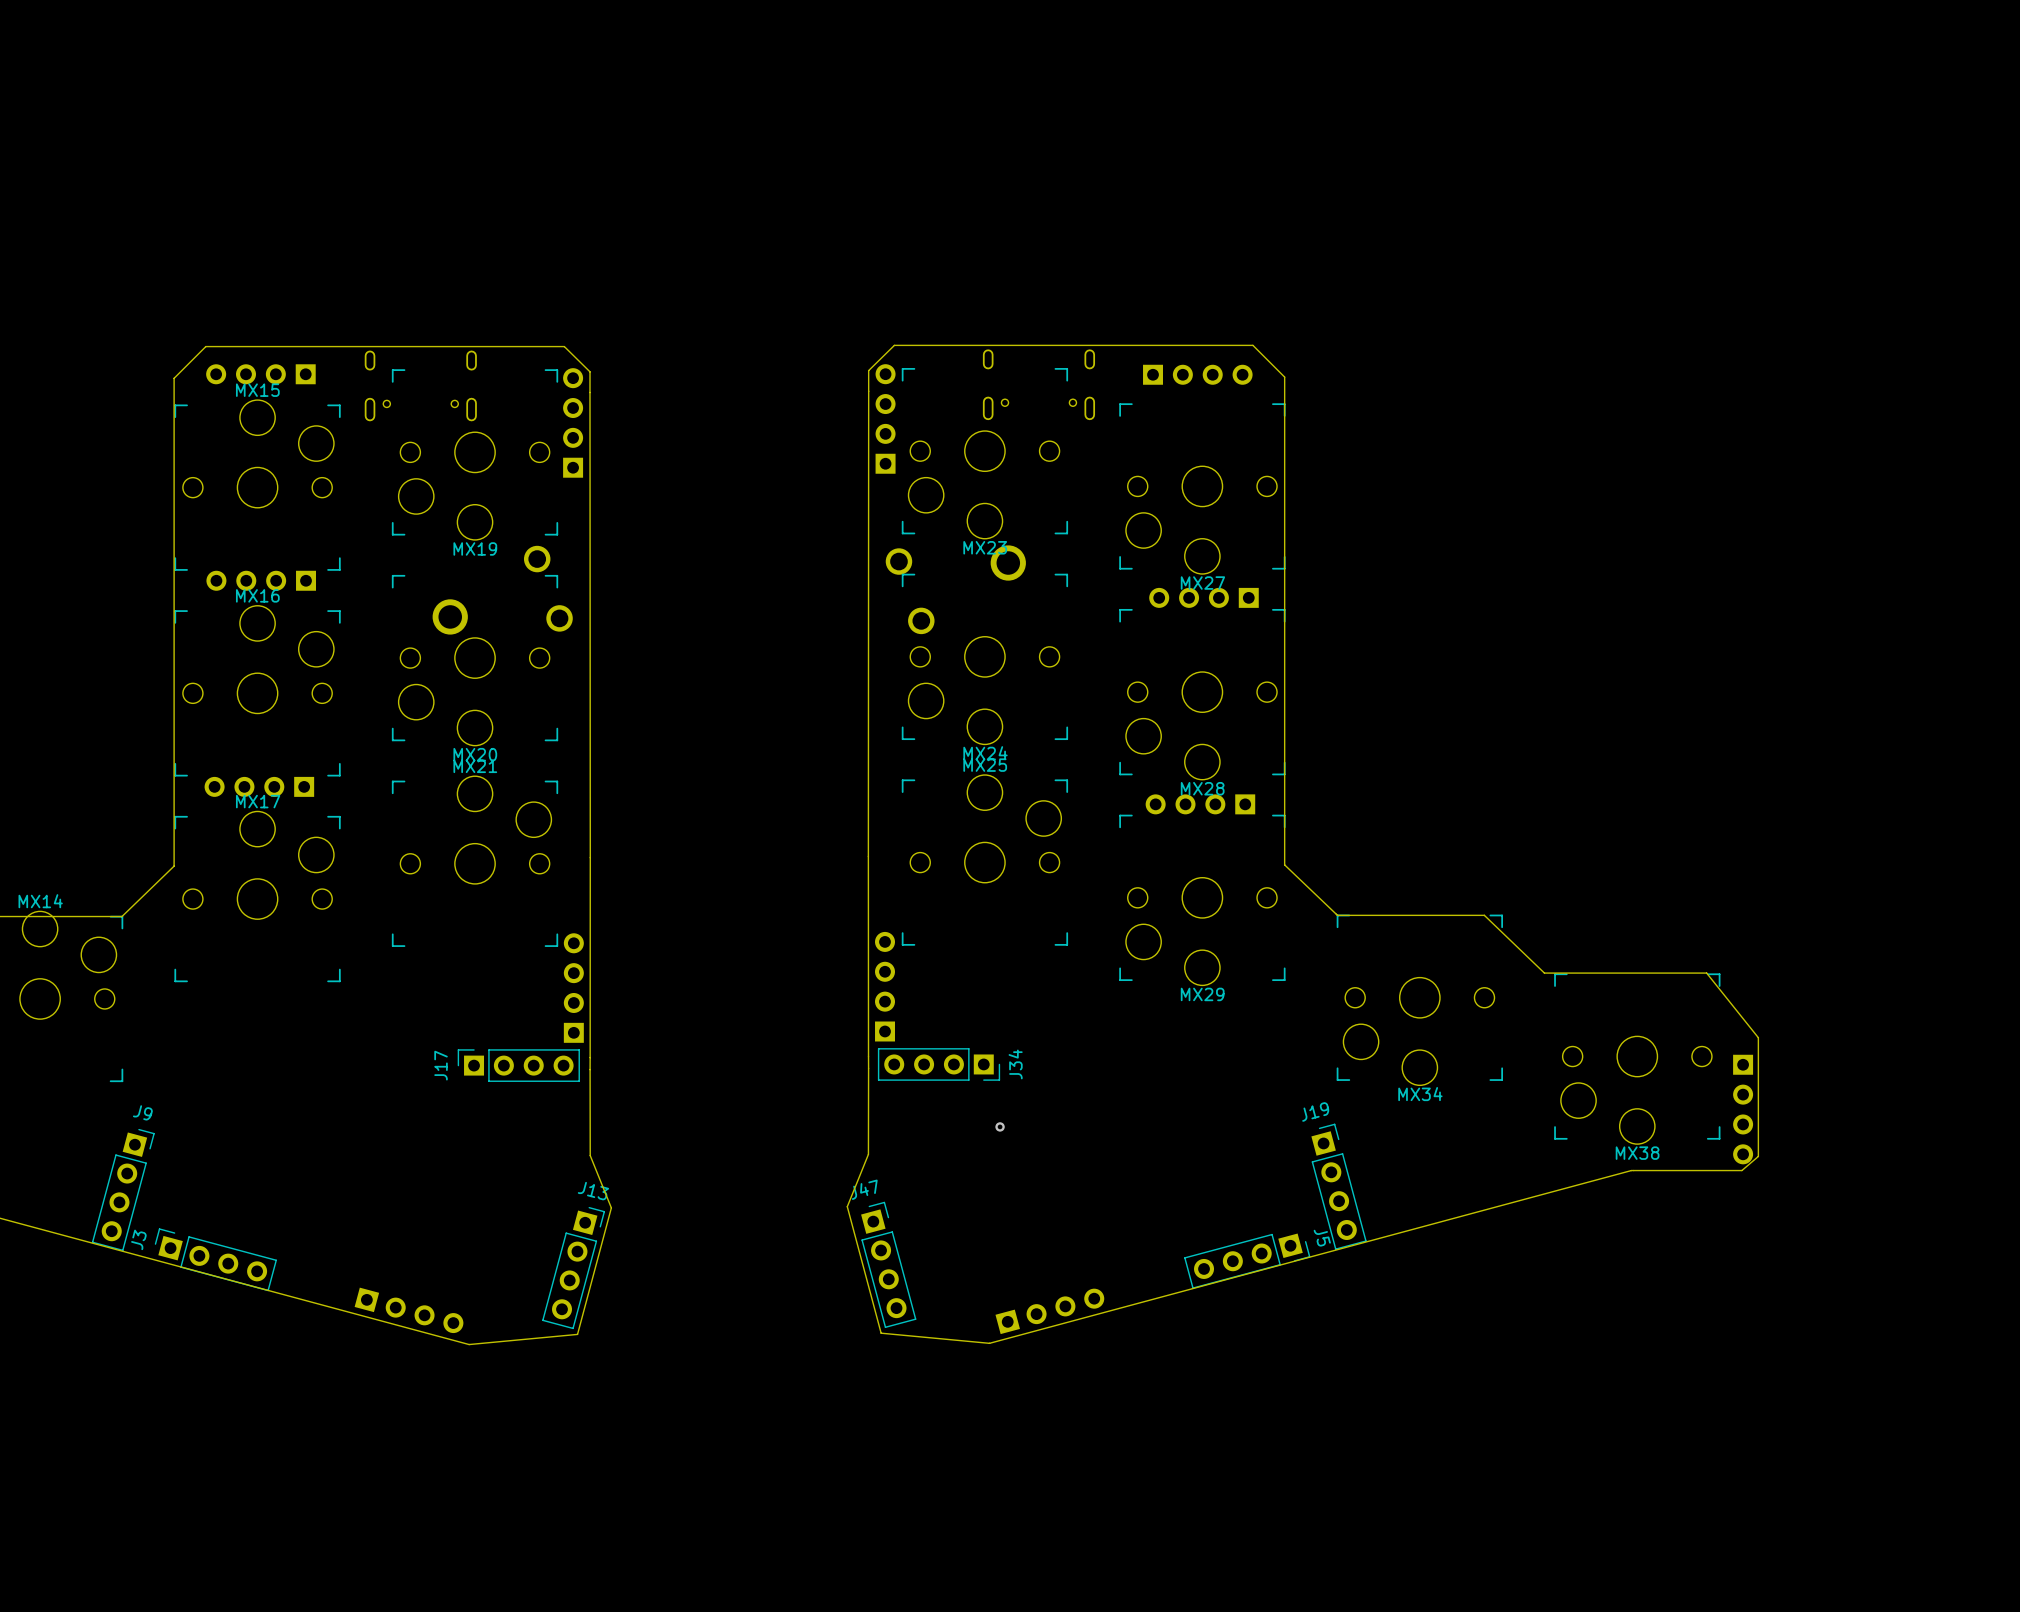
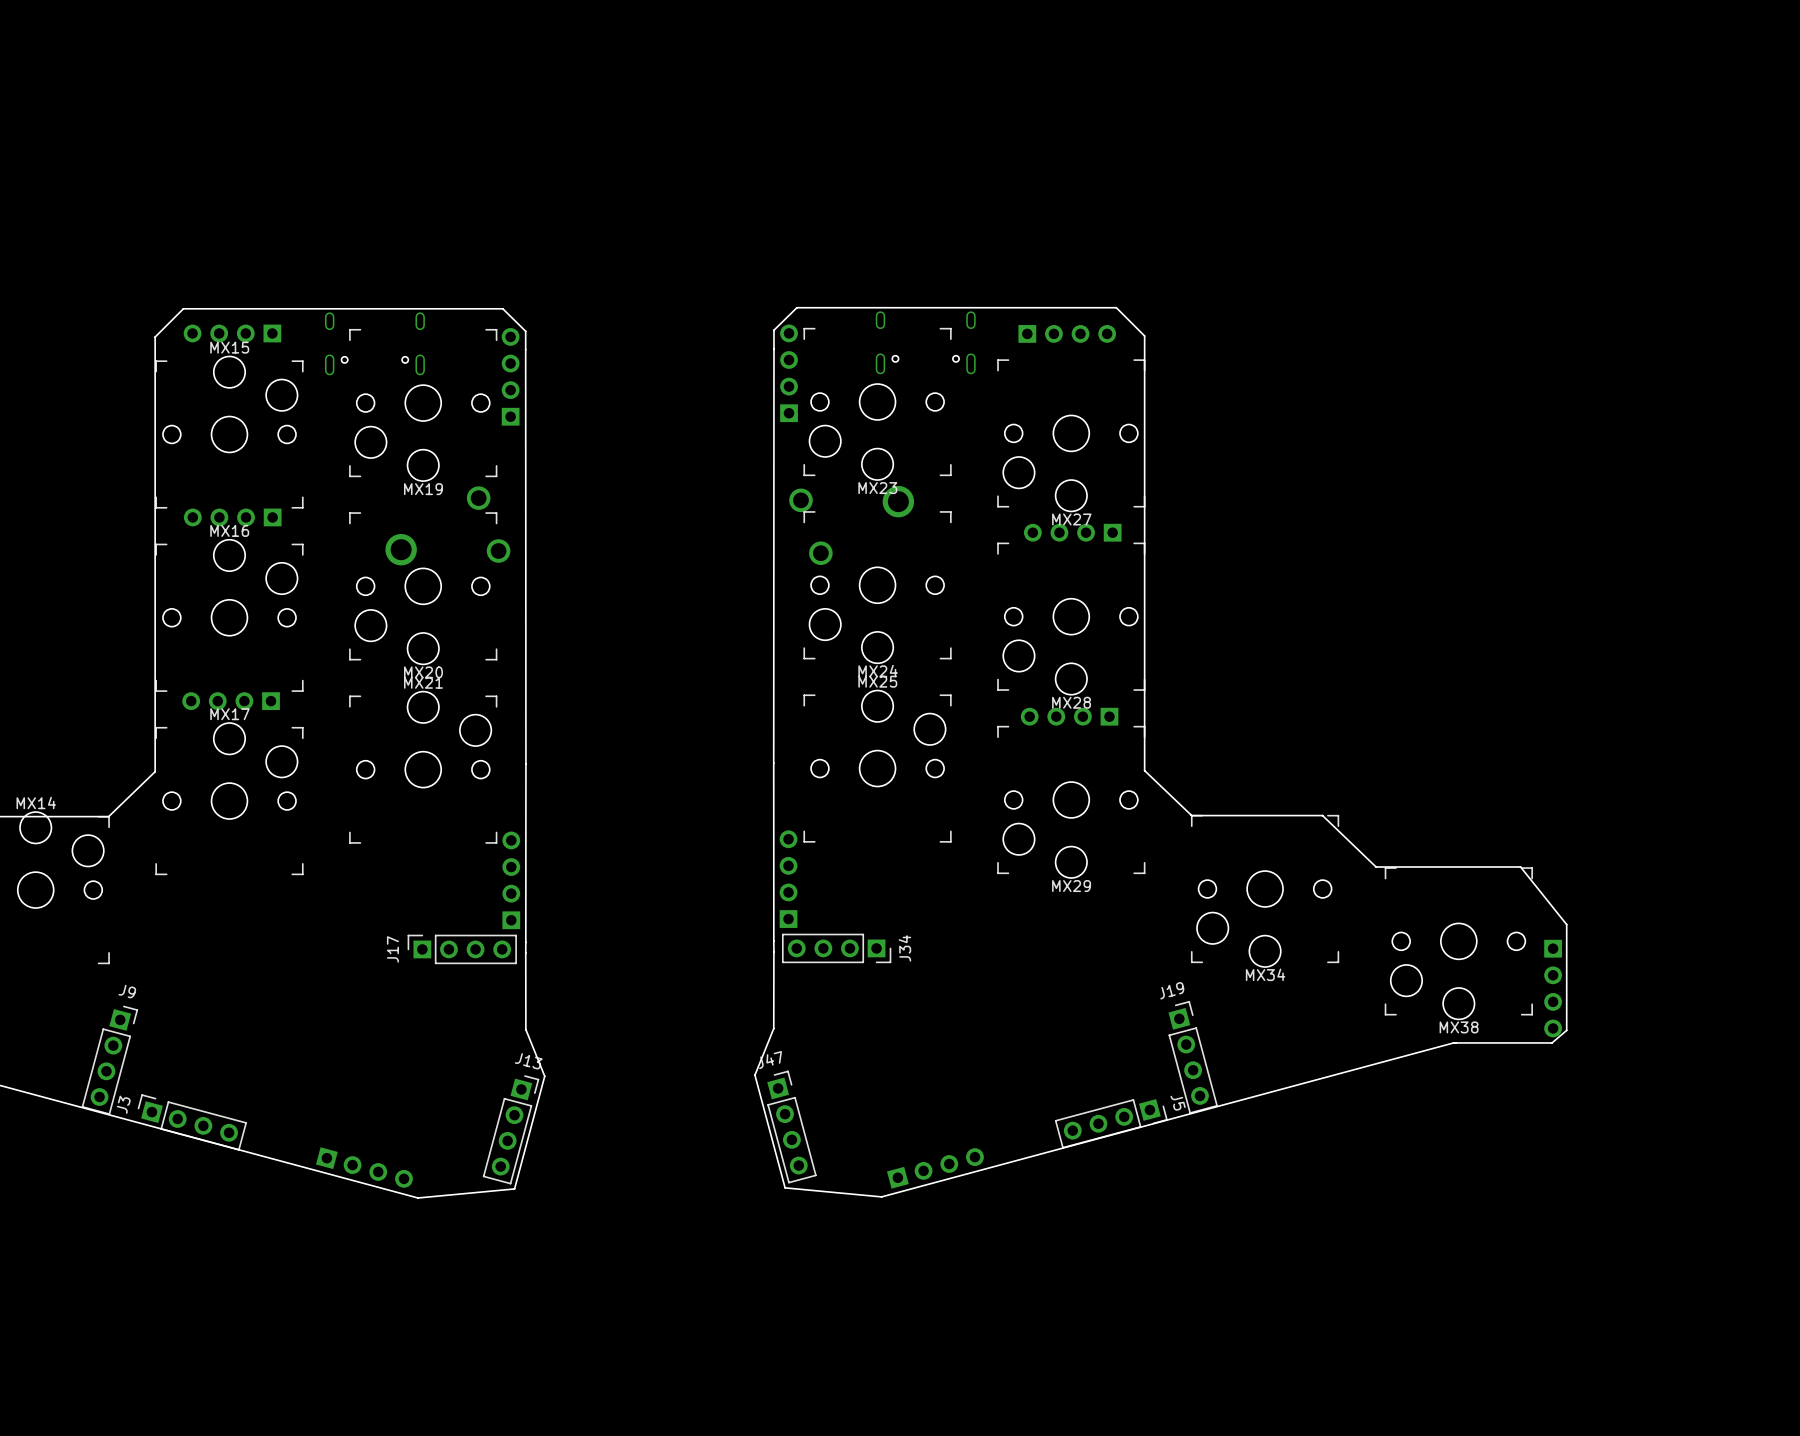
via: (1000, 1126) -> none

